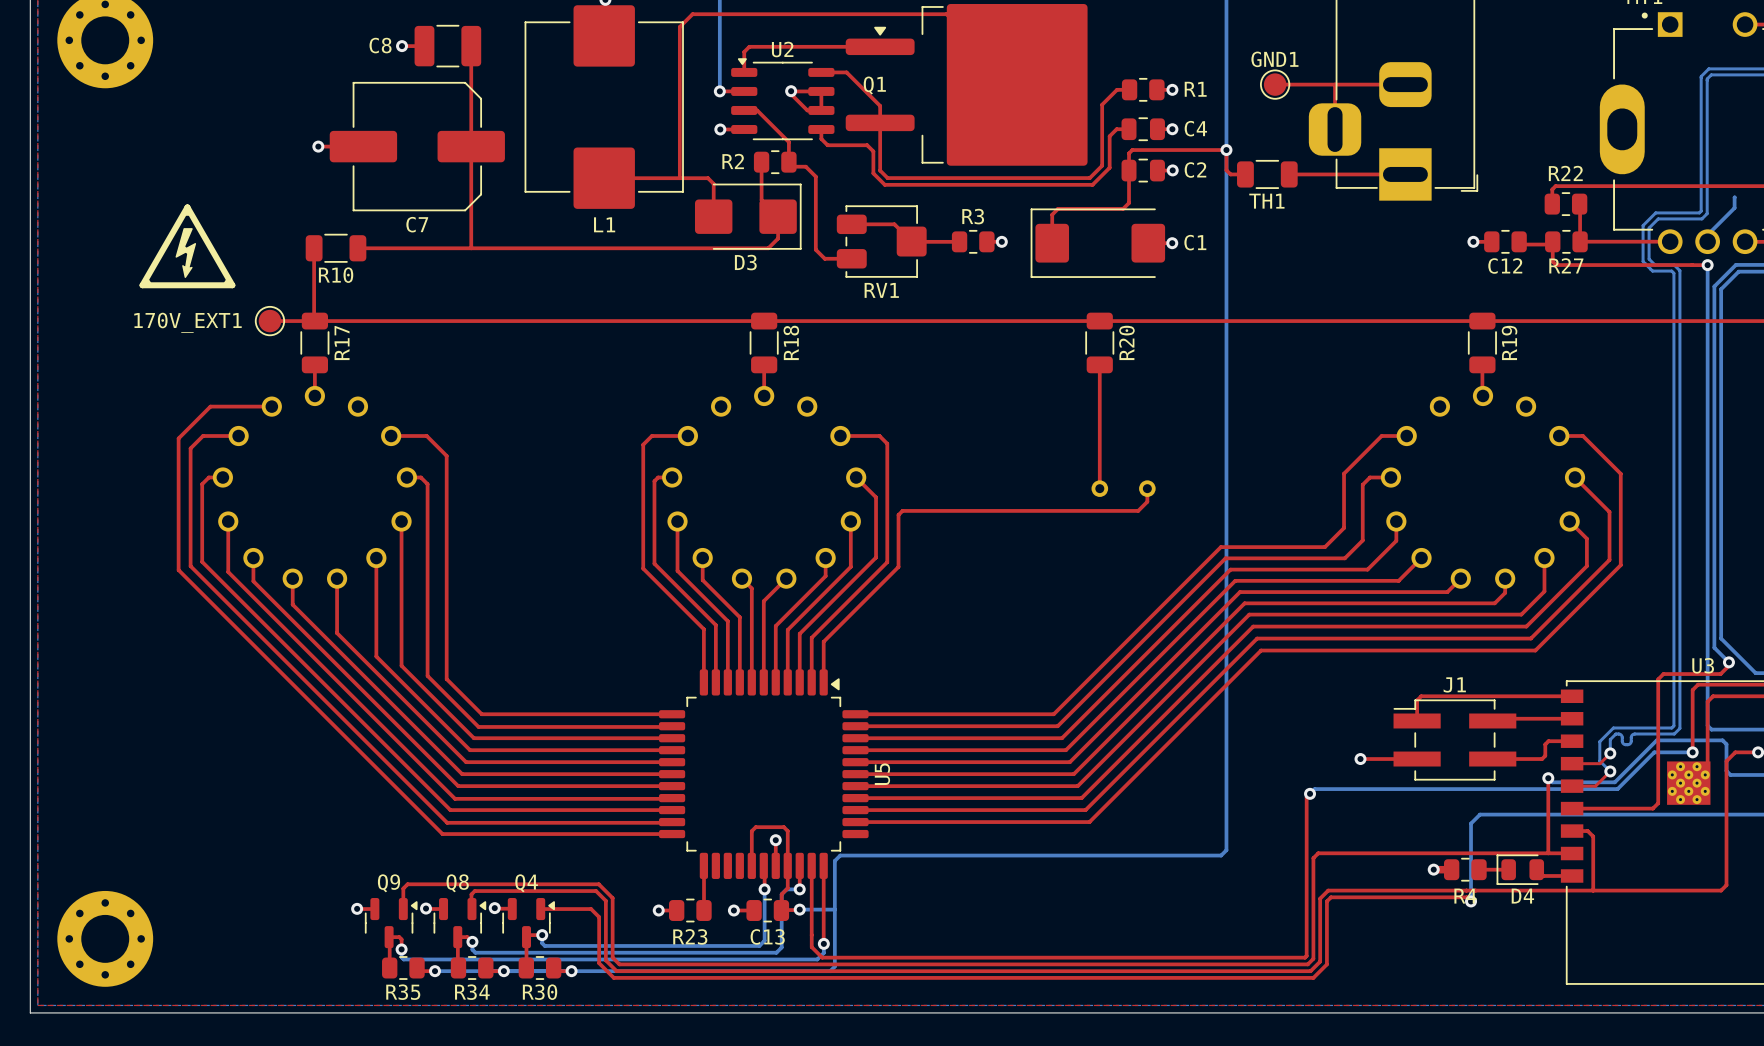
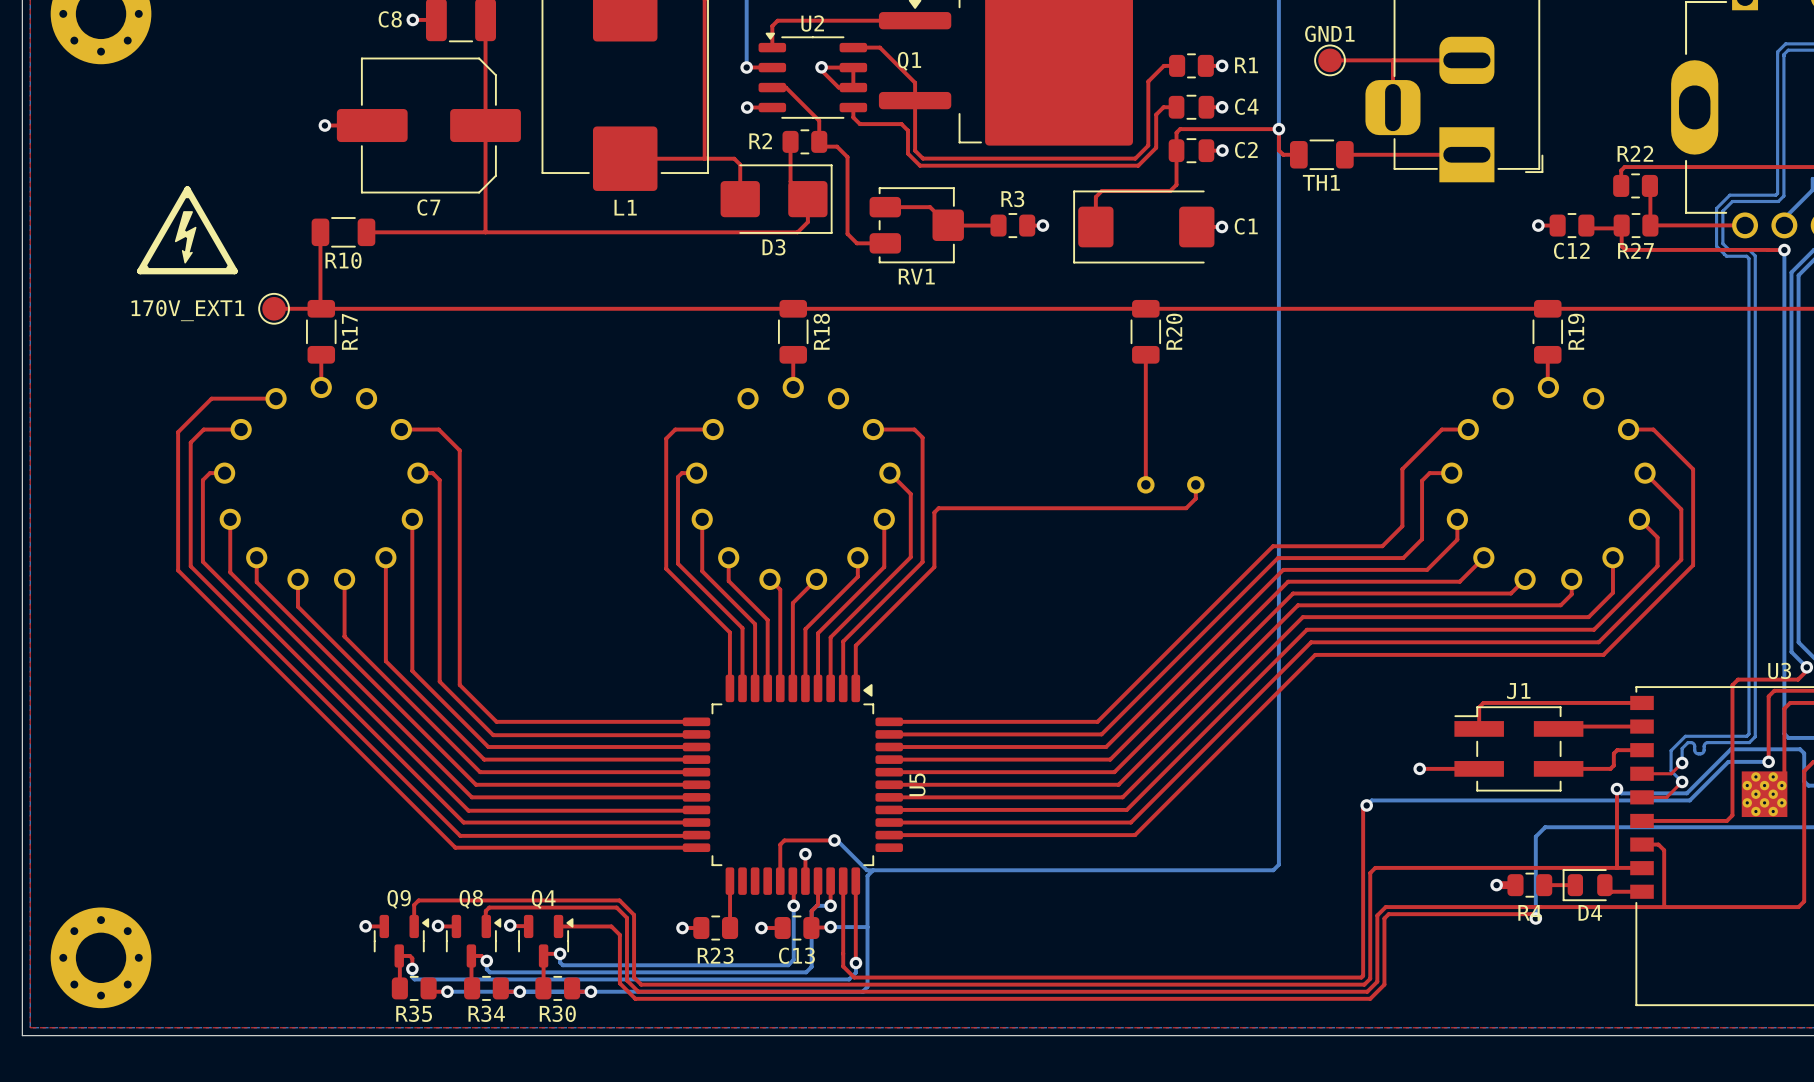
top track: (783, 827) (787, 831) (787, 865) -> (813, 840) (834, 840)
bottom track: none -> (834, 840) (837, 840) (867, 870) (873, 870)
via: none -> (834, 840)

